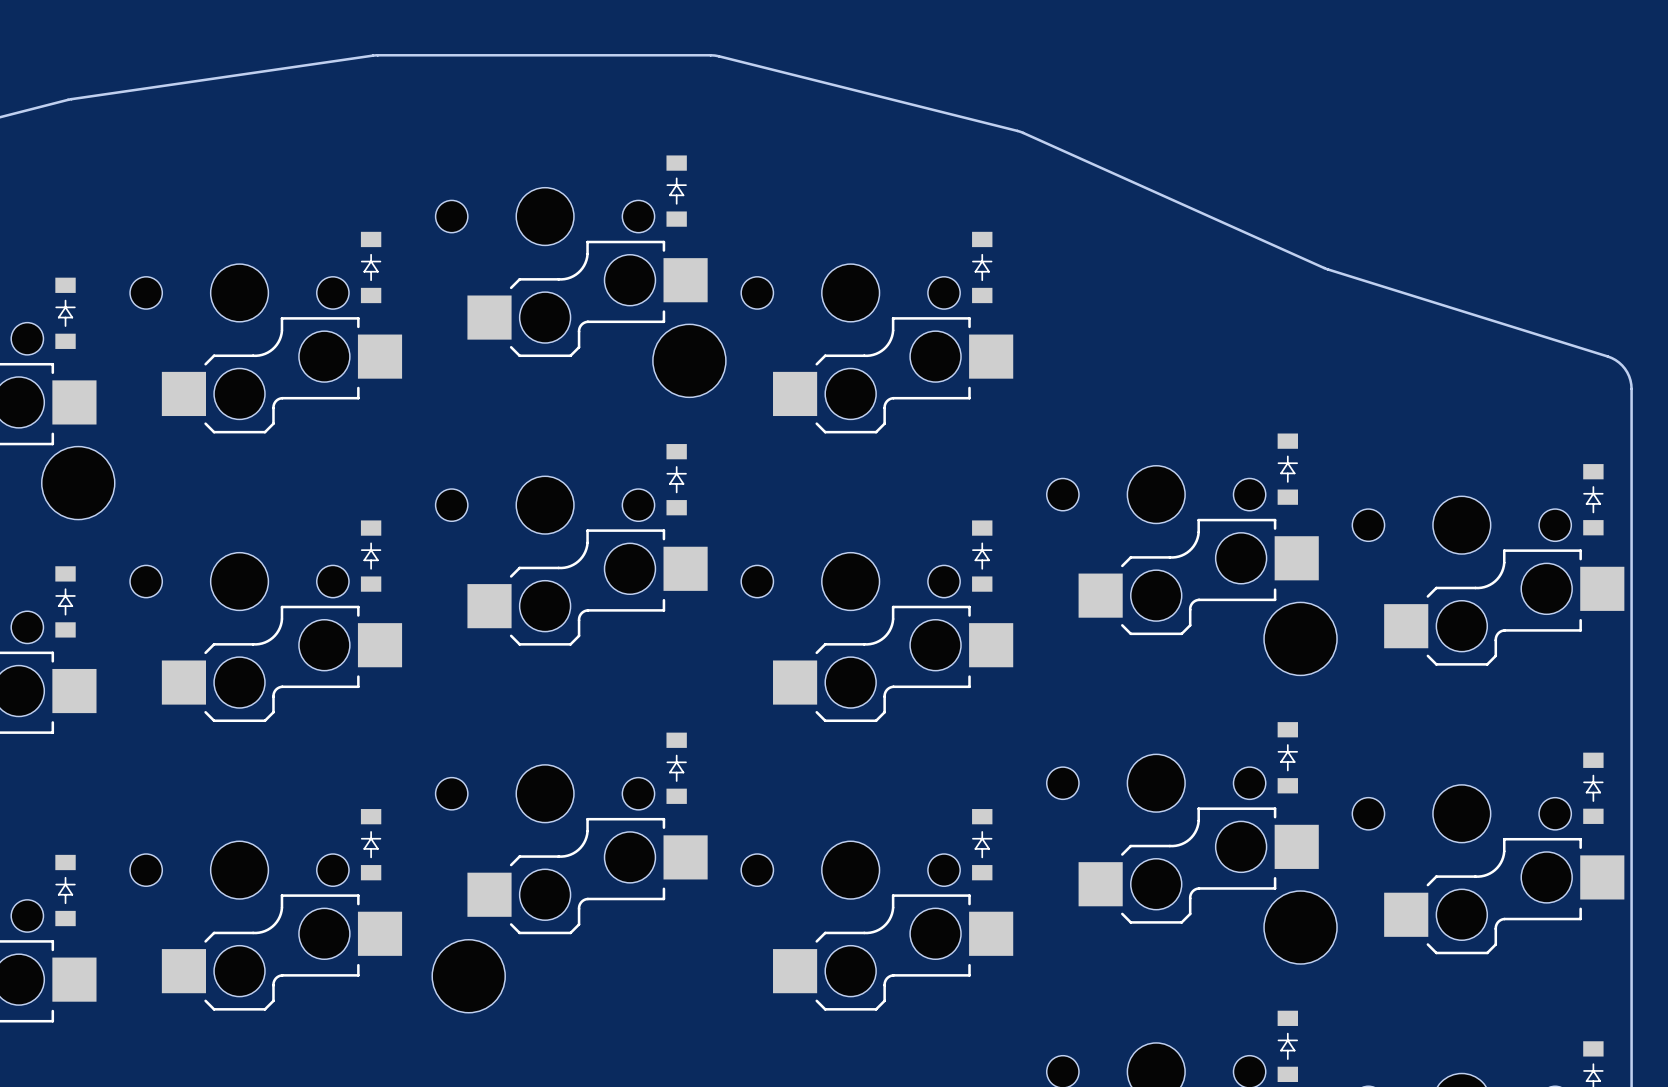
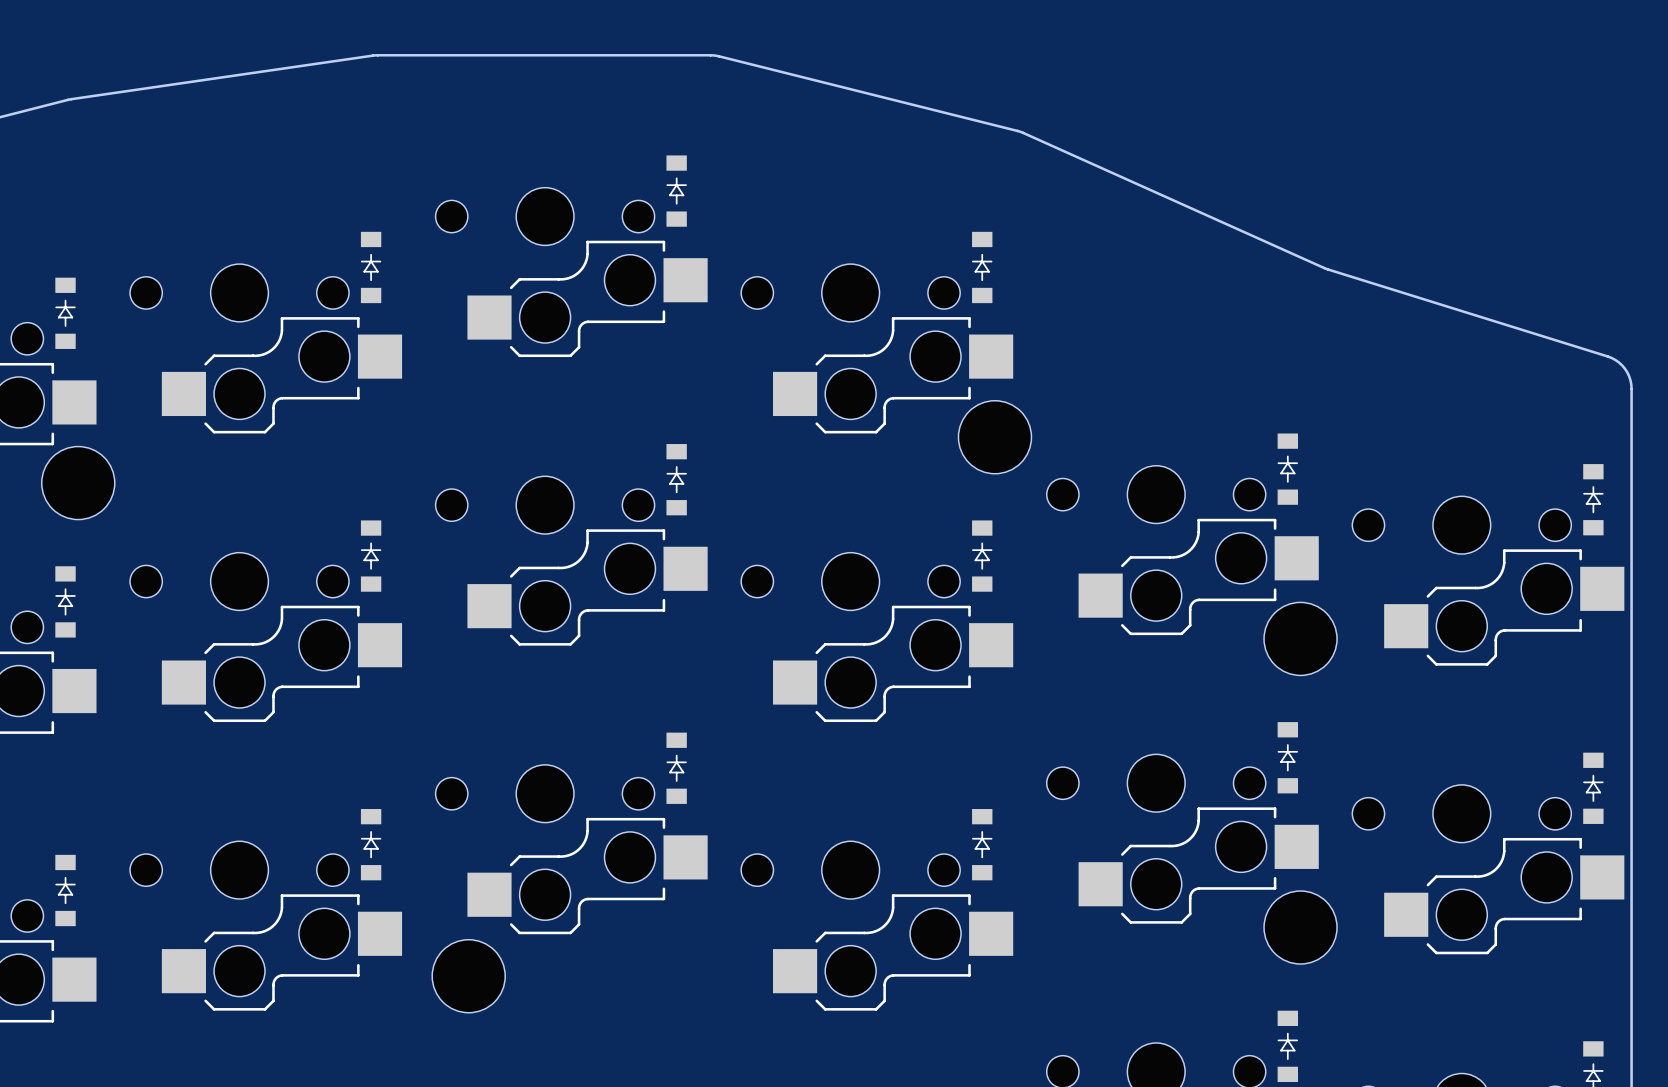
part position: (689, 360) -> (994, 437)

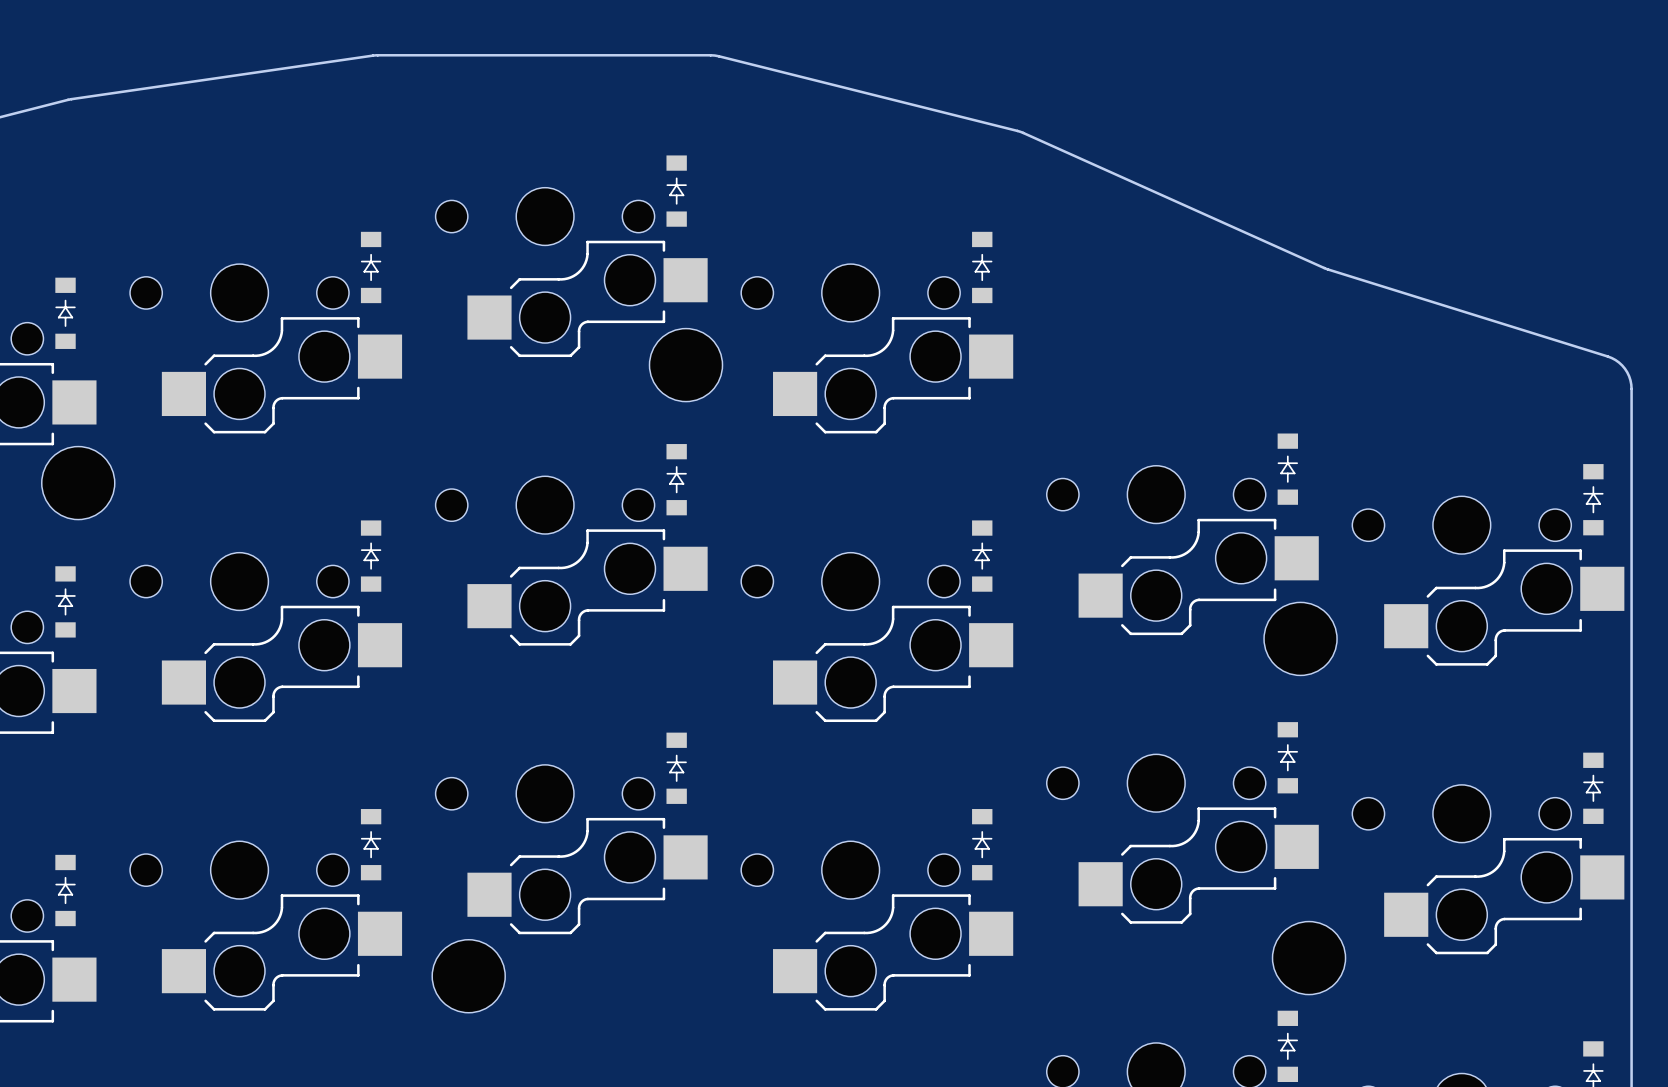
part: none -> (686, 365)
part: (994, 437) -> none
part position: (1300, 927) -> (1309, 958)

